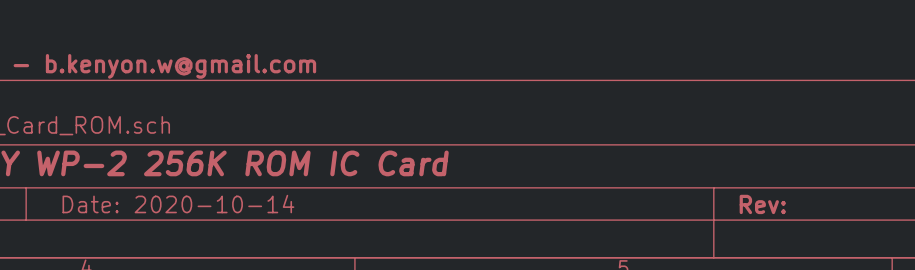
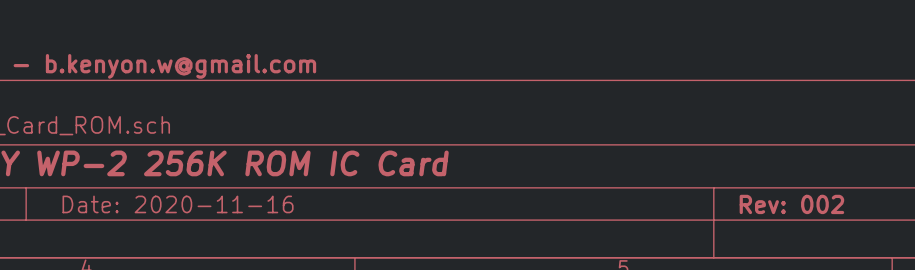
title block: Date: 2020-10-14 (178, 204) -> Date: 2020-11-16 (178, 204)
title block: Rev: (762, 204) -> Rev: 002 (791, 204)

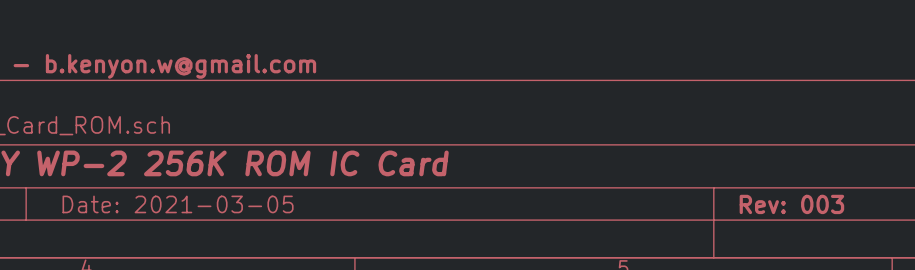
title block: Date: 2020-11-16 (178, 204) -> Date: 2021-03-05 (178, 204)
title block: Rev: 002 (791, 204) -> Rev: 003 (791, 204)

